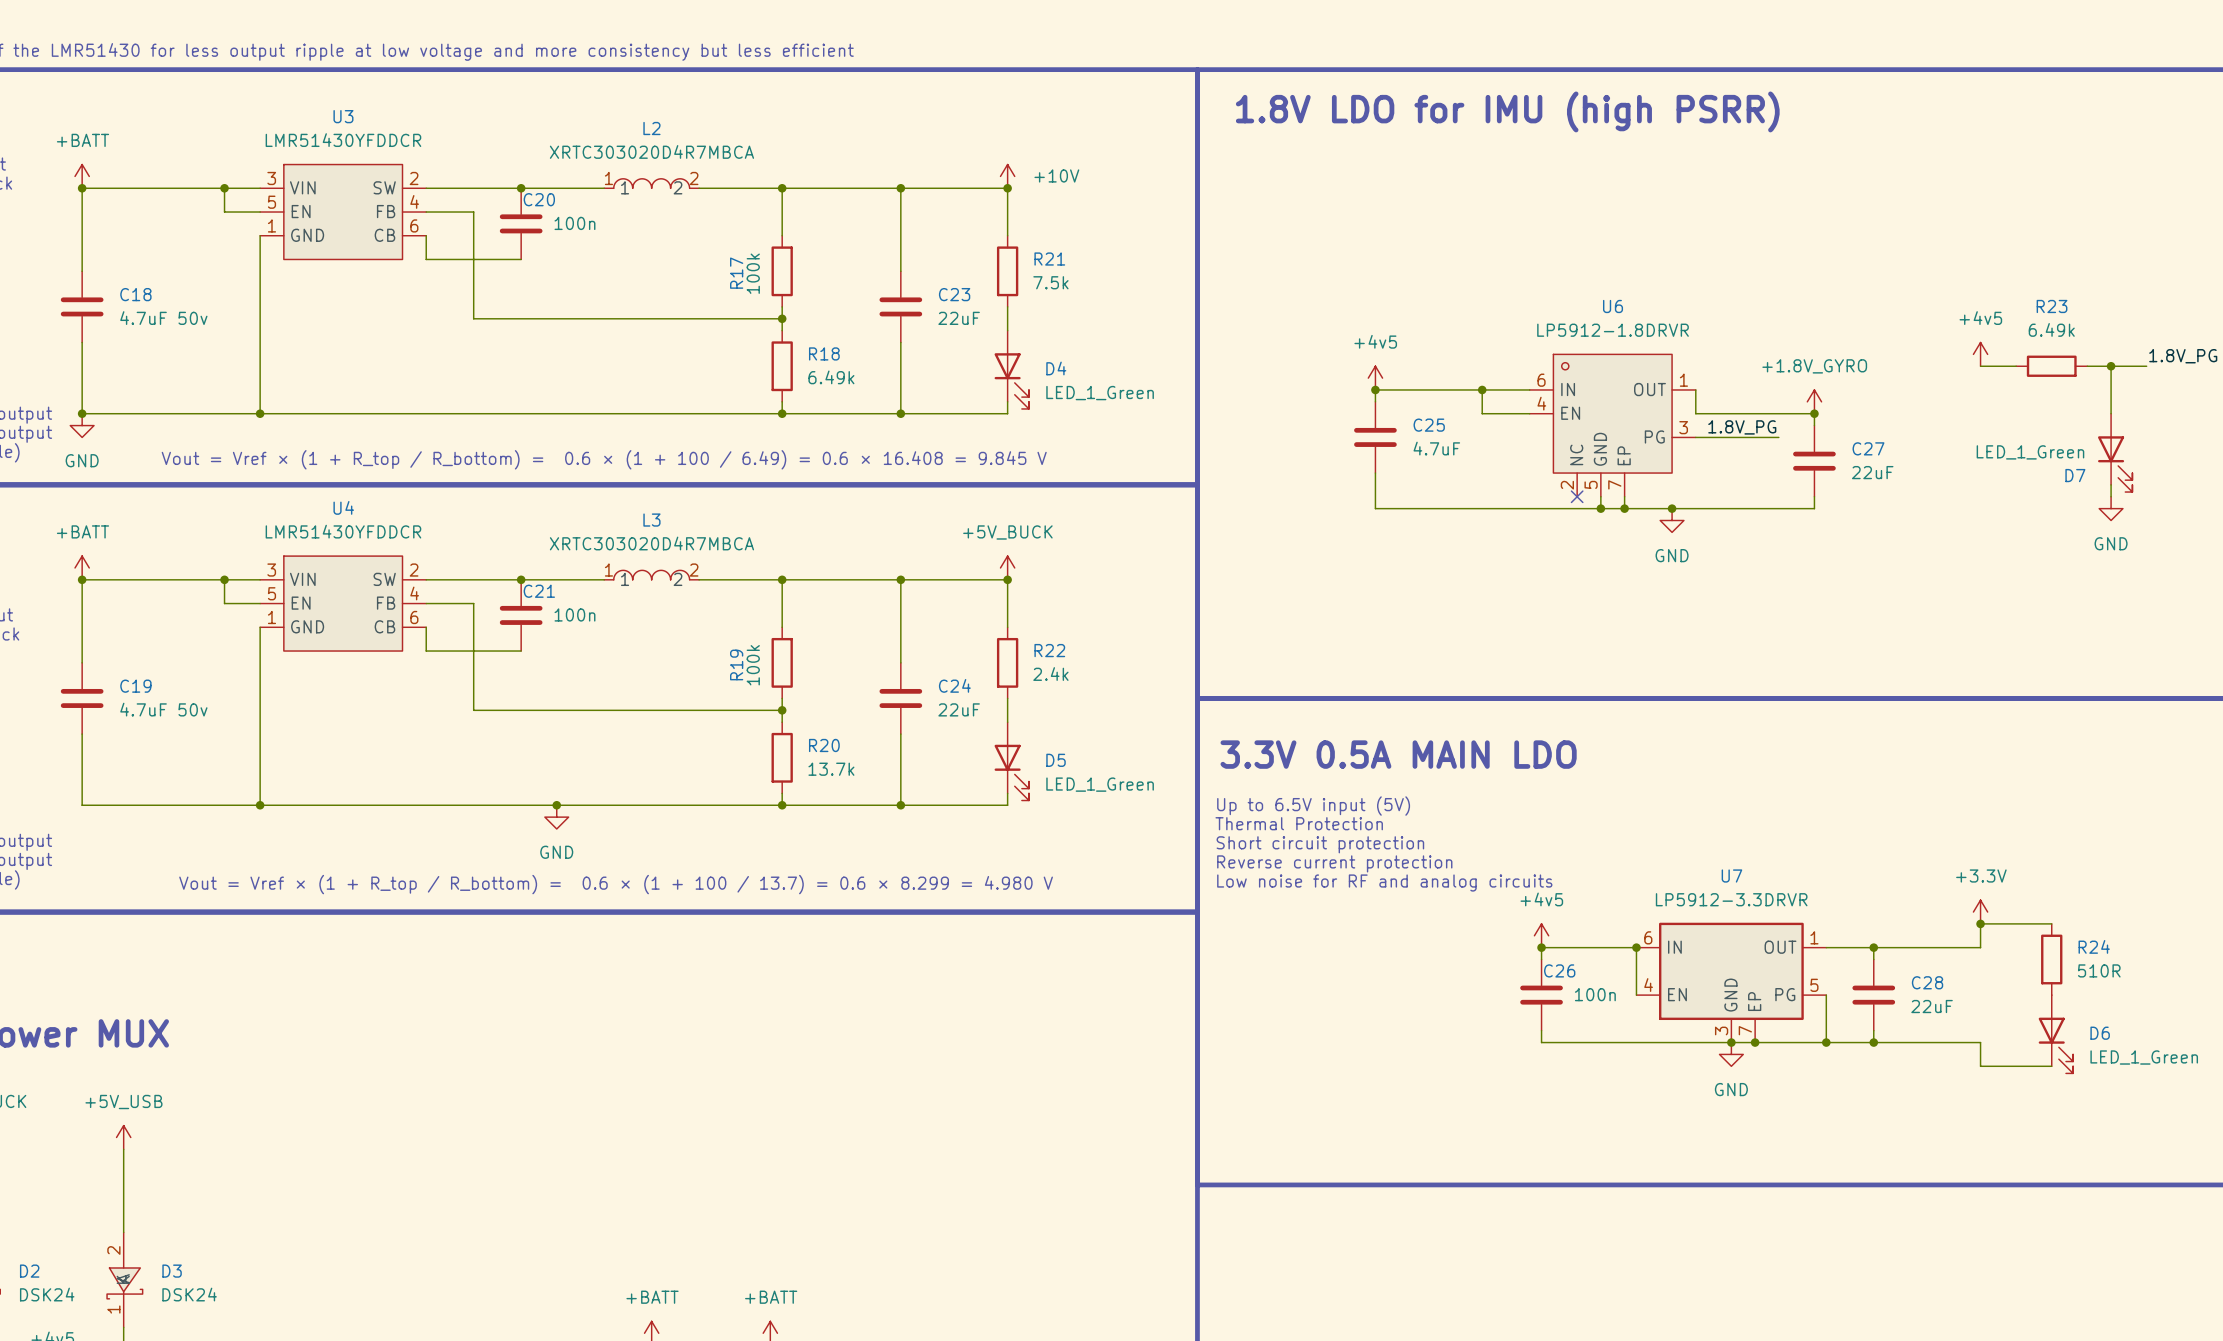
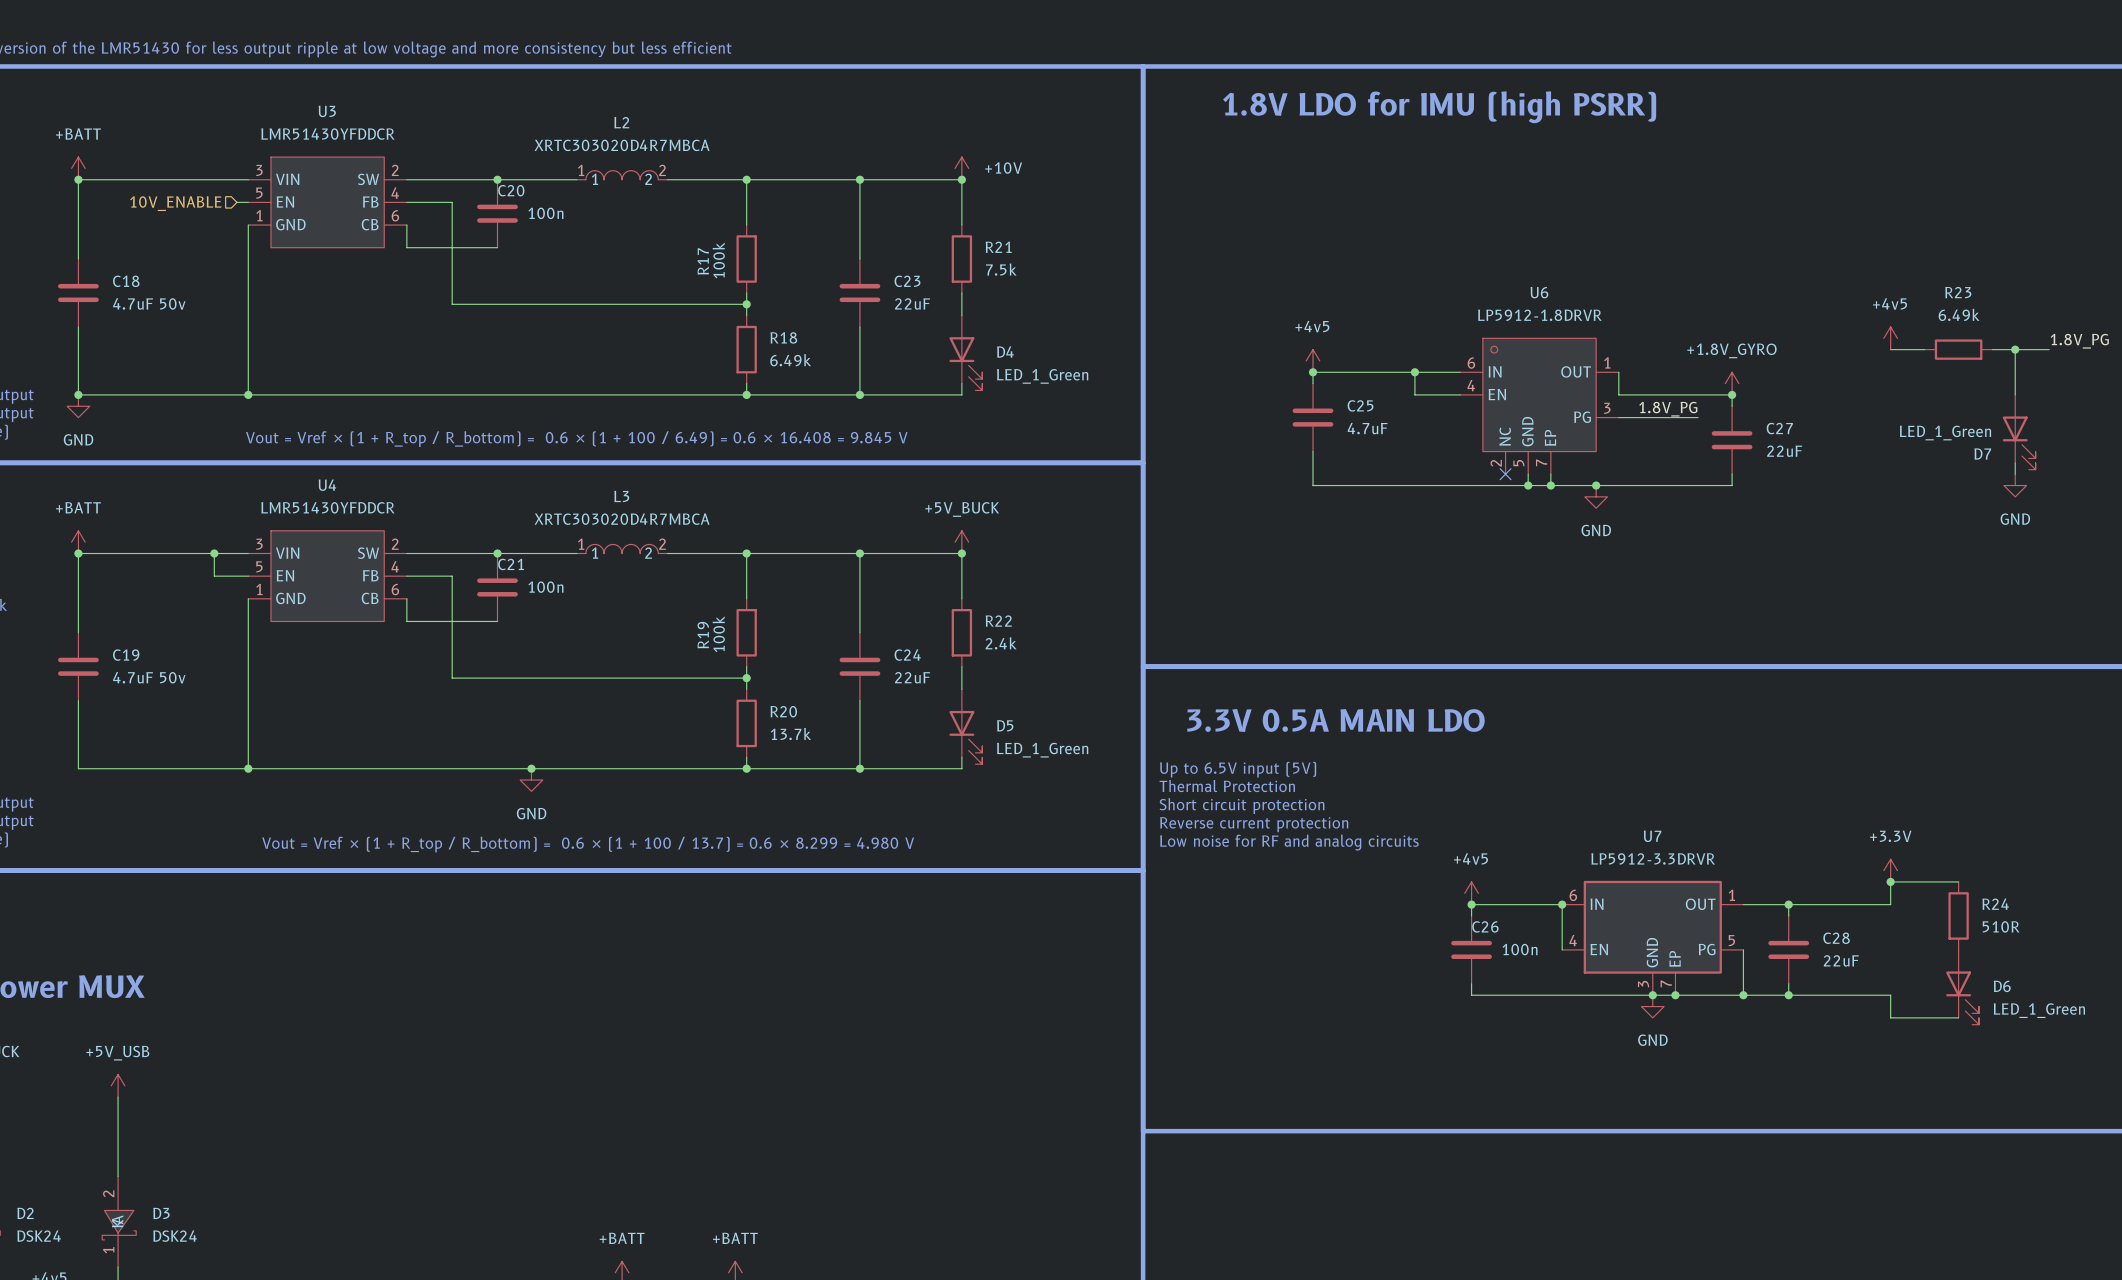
wire: (224, 188) (224, 212) (248, 212) -> none
junction: (224, 188) -> none
hierarchical label: none -> 10V_ENABLE (175, 203)

